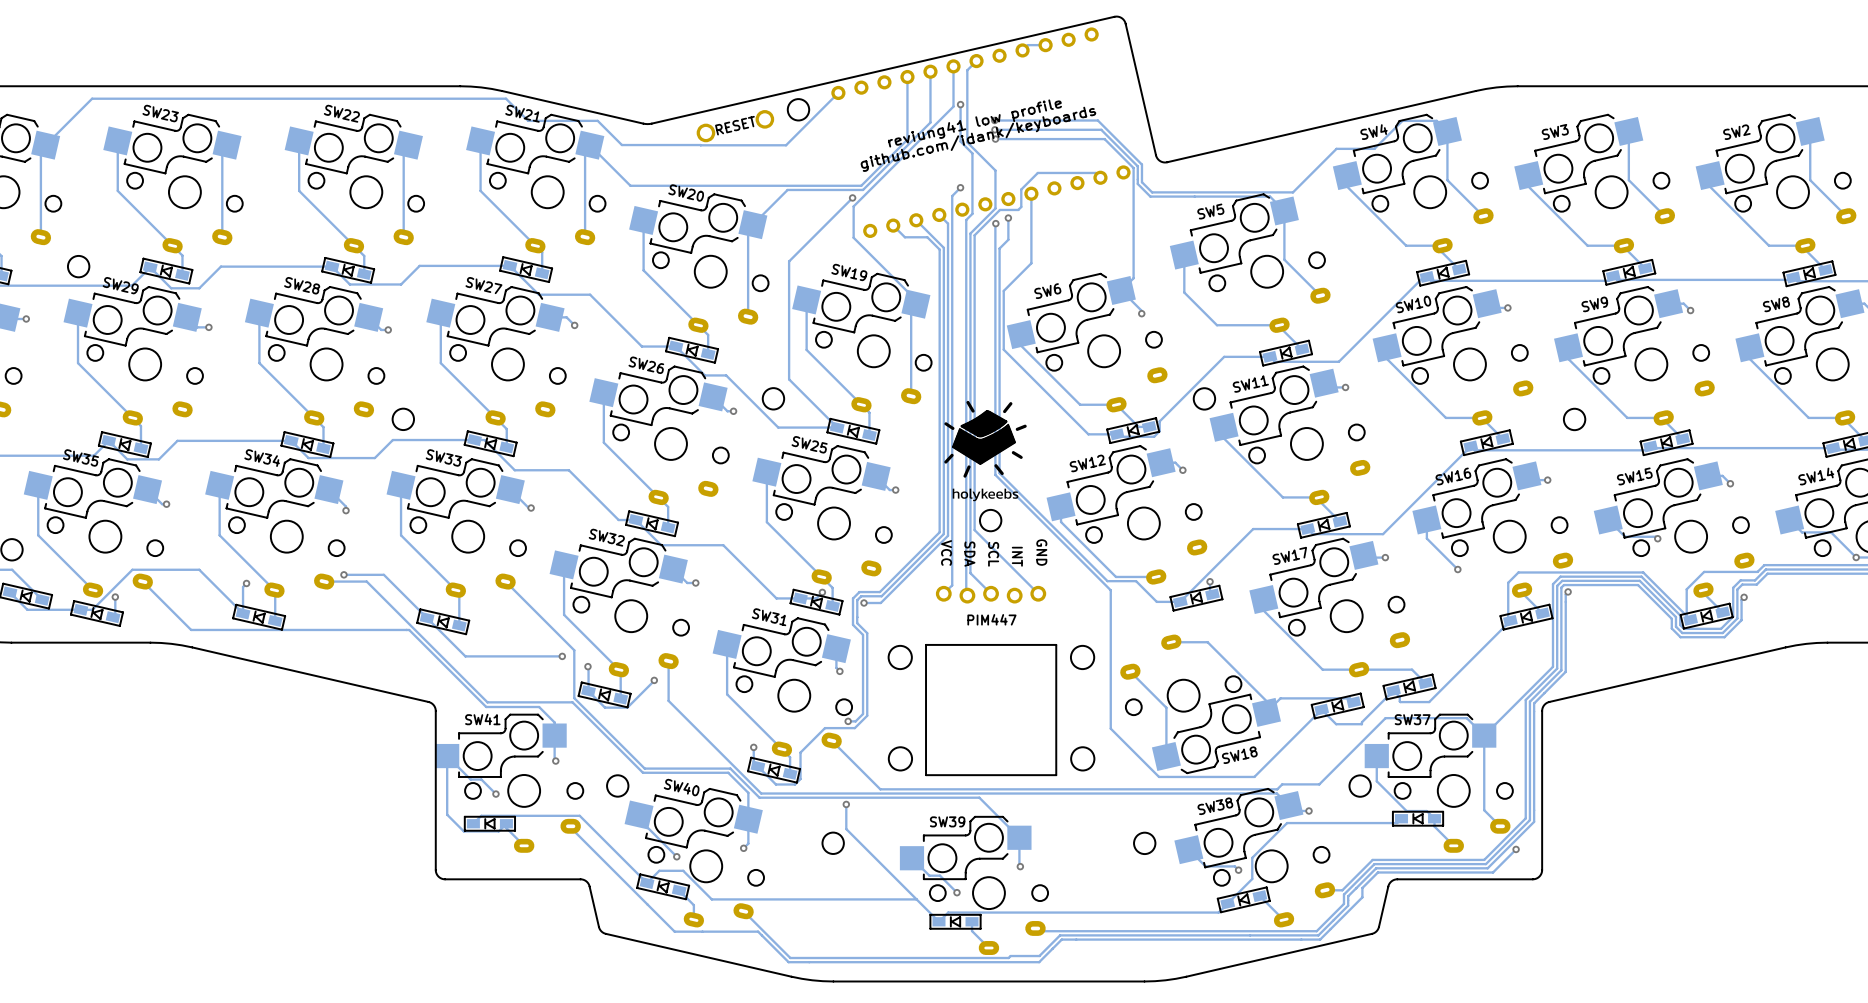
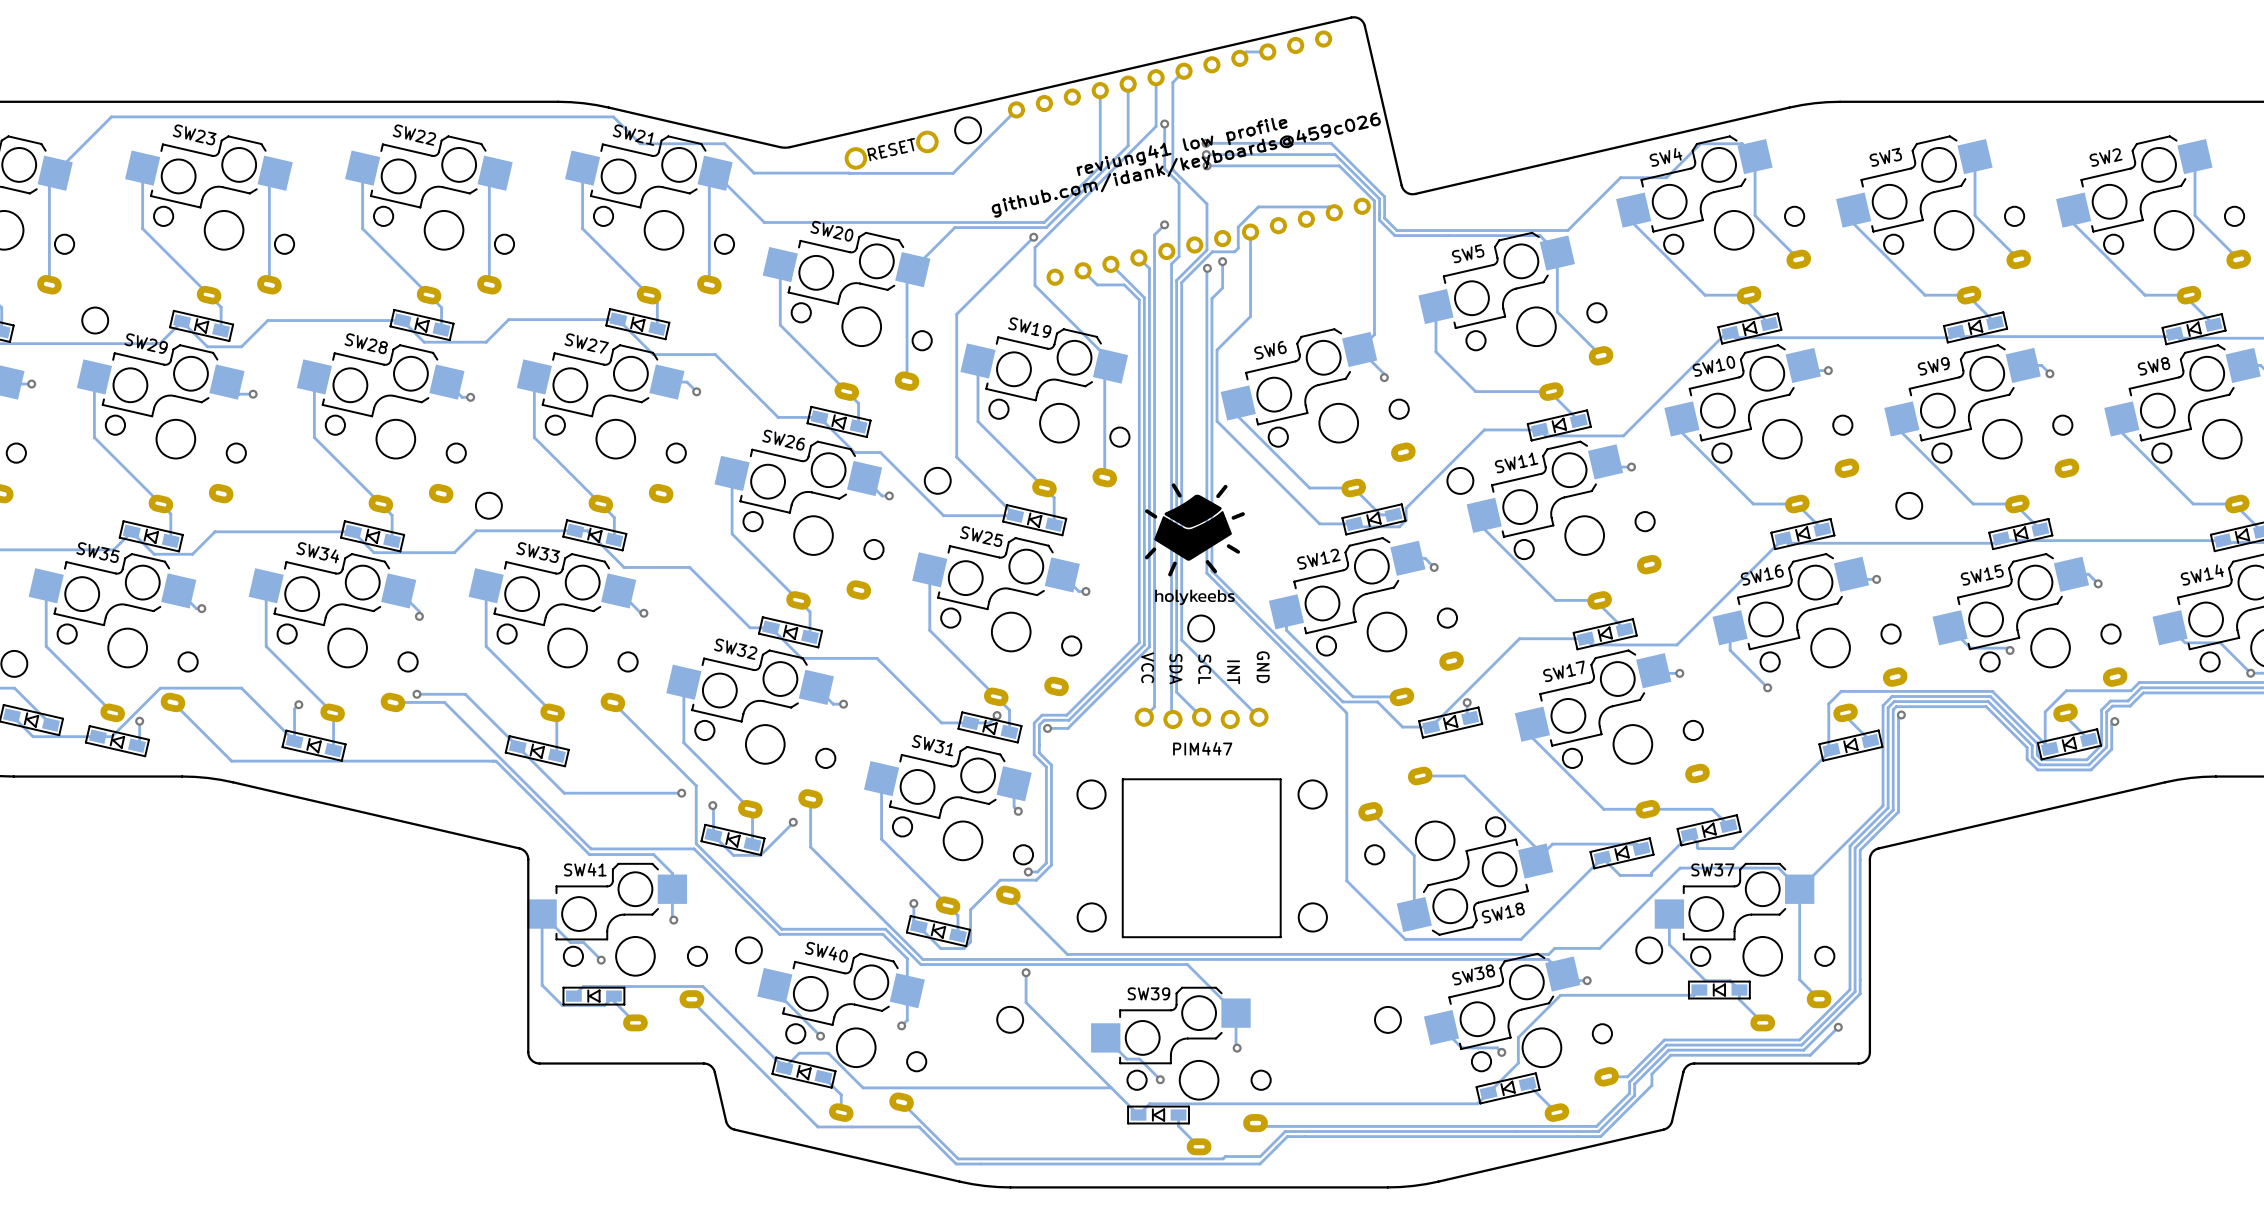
text: github.com/idank/keyboards (978, 139) -> github.com/idank/keyboards@459c026 (1186, 165)

